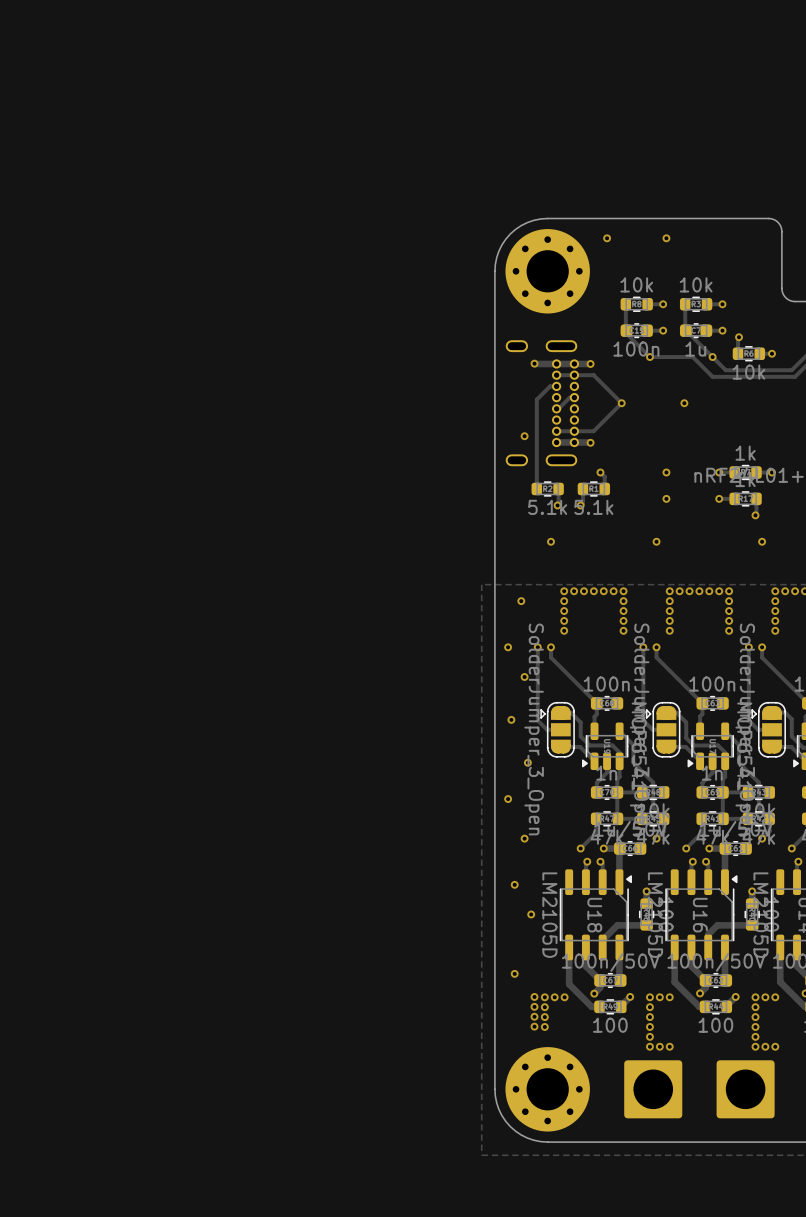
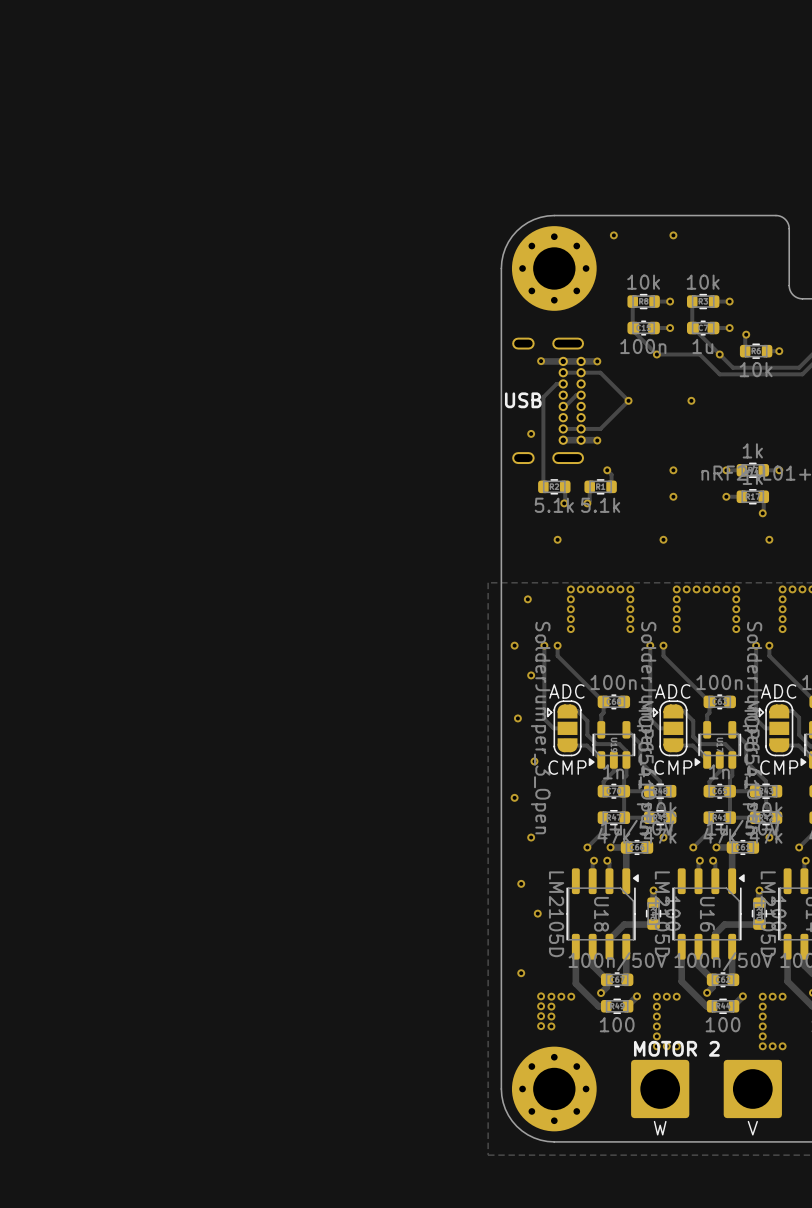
text: none -> USB (523, 400)
text: none -> ADC (566, 691)
text: none -> ADC (672, 691)
text: none -> ADC (778, 691)
text: none -> CMP (567, 767)
text: none -> CMP (673, 767)
text: none -> CMP (779, 767)
text: none -> MOTOR 2 (676, 1048)
text: none -> W (660, 1128)
text: none -> V (752, 1128)

